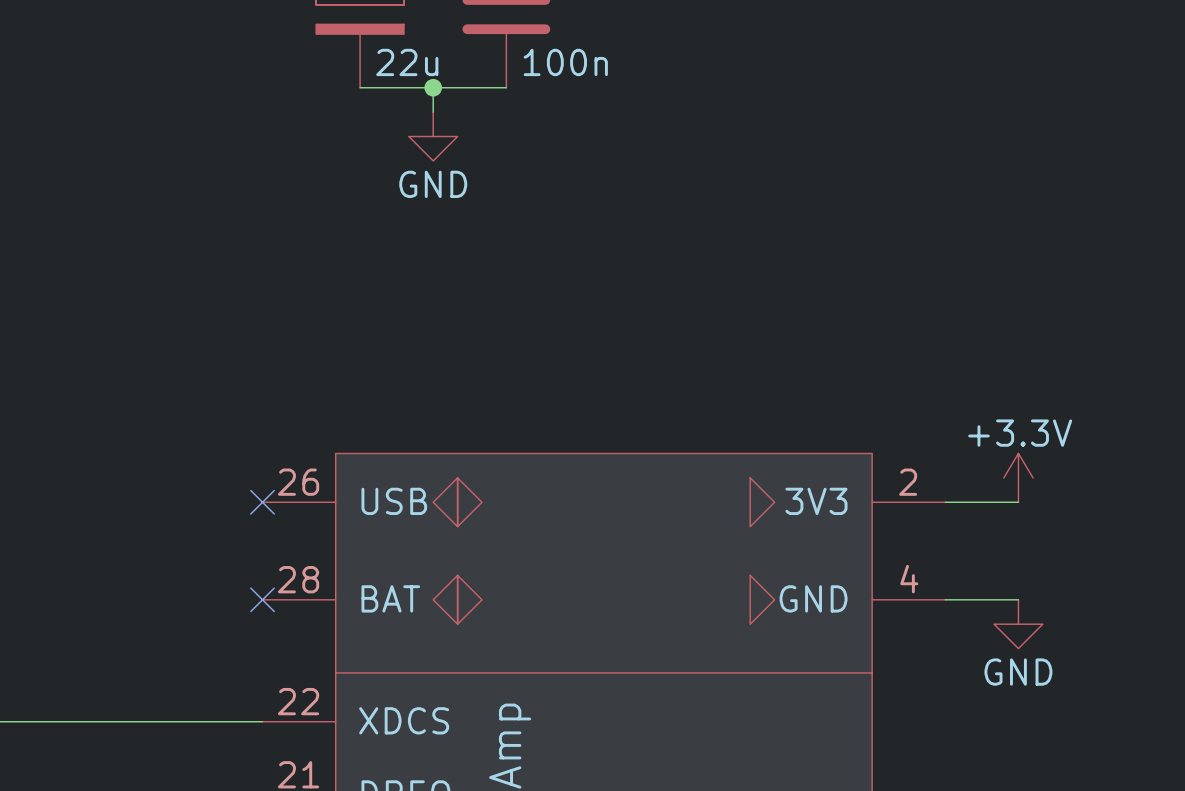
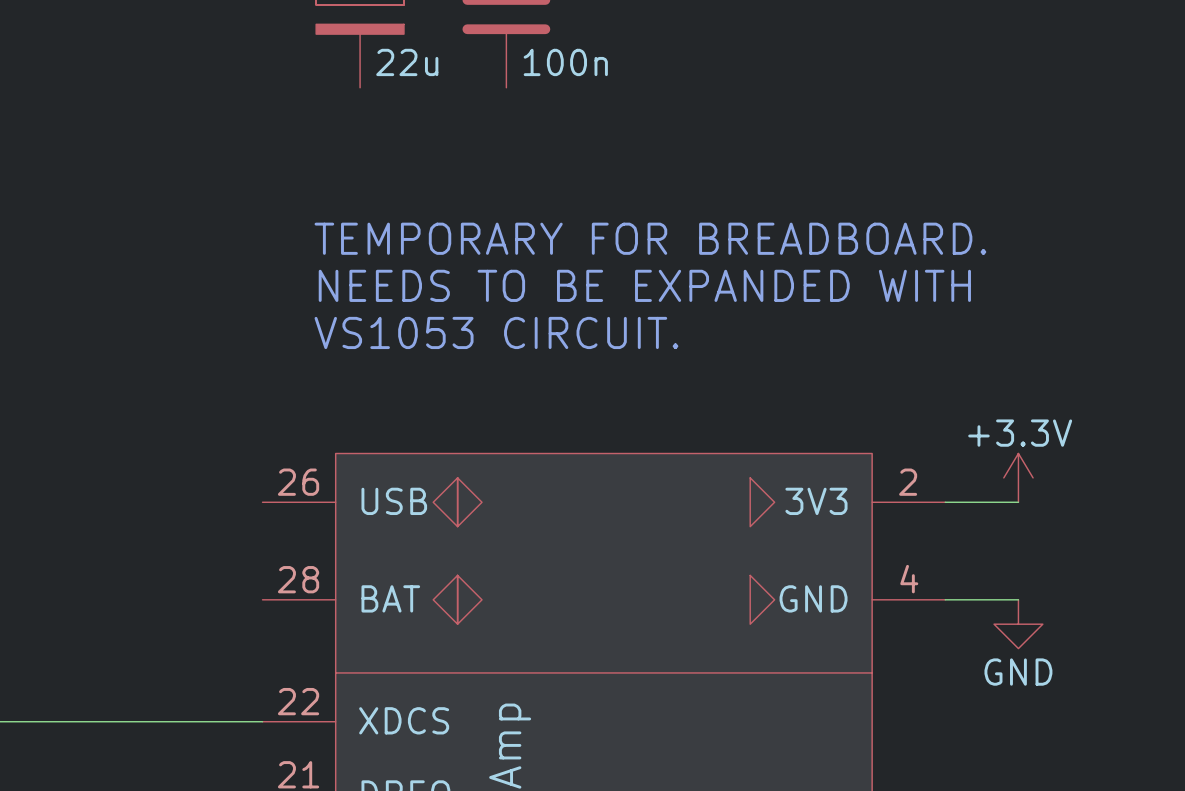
wire: (360, 87) (506, 87) -> none
wire: (433, 87) (433, 112) -> none
junction: (433, 87) -> none
power symbol: GND (433, 136) -> none
text: none -> TEMPORARY FOR BREADBOARD. (650, 238)
text: none -> NEEDS TO BE EXPANDED WITH (644, 285)
text: none -> VS1053 CIRCUIT. (496, 332)
no-connect mark: (262, 502) -> none
no-connect mark: (262, 599) -> none

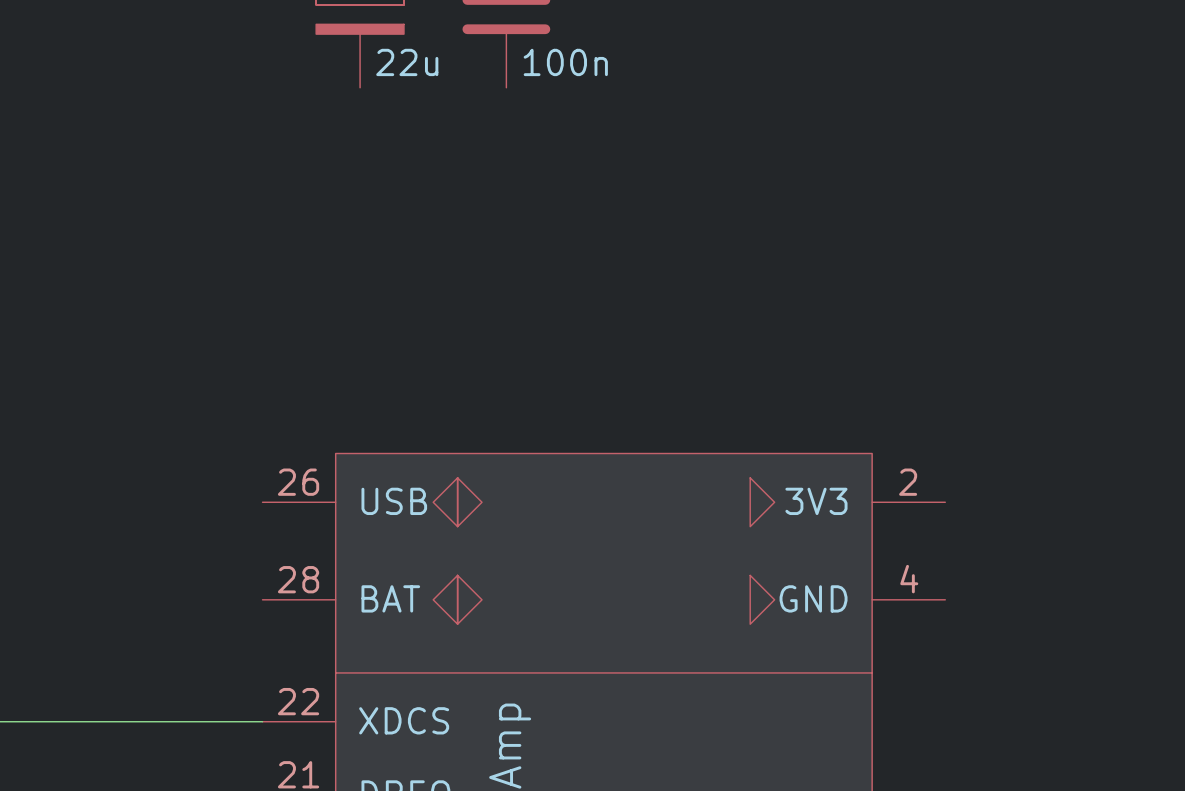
text: TEMPORARY FOR BREADBOARD. (650, 238) -> none
text: NEEDS TO BE EXPANDED WITH (644, 285) -> none
text: VS1053 CIRCUIT. (496, 332) -> none
power symbol: +3.3V (1018, 477) -> none
wire: (945, 502) (1018, 502) -> none
wire: (945, 599) (1018, 599) -> none
power symbol: GND (1018, 624) -> none

